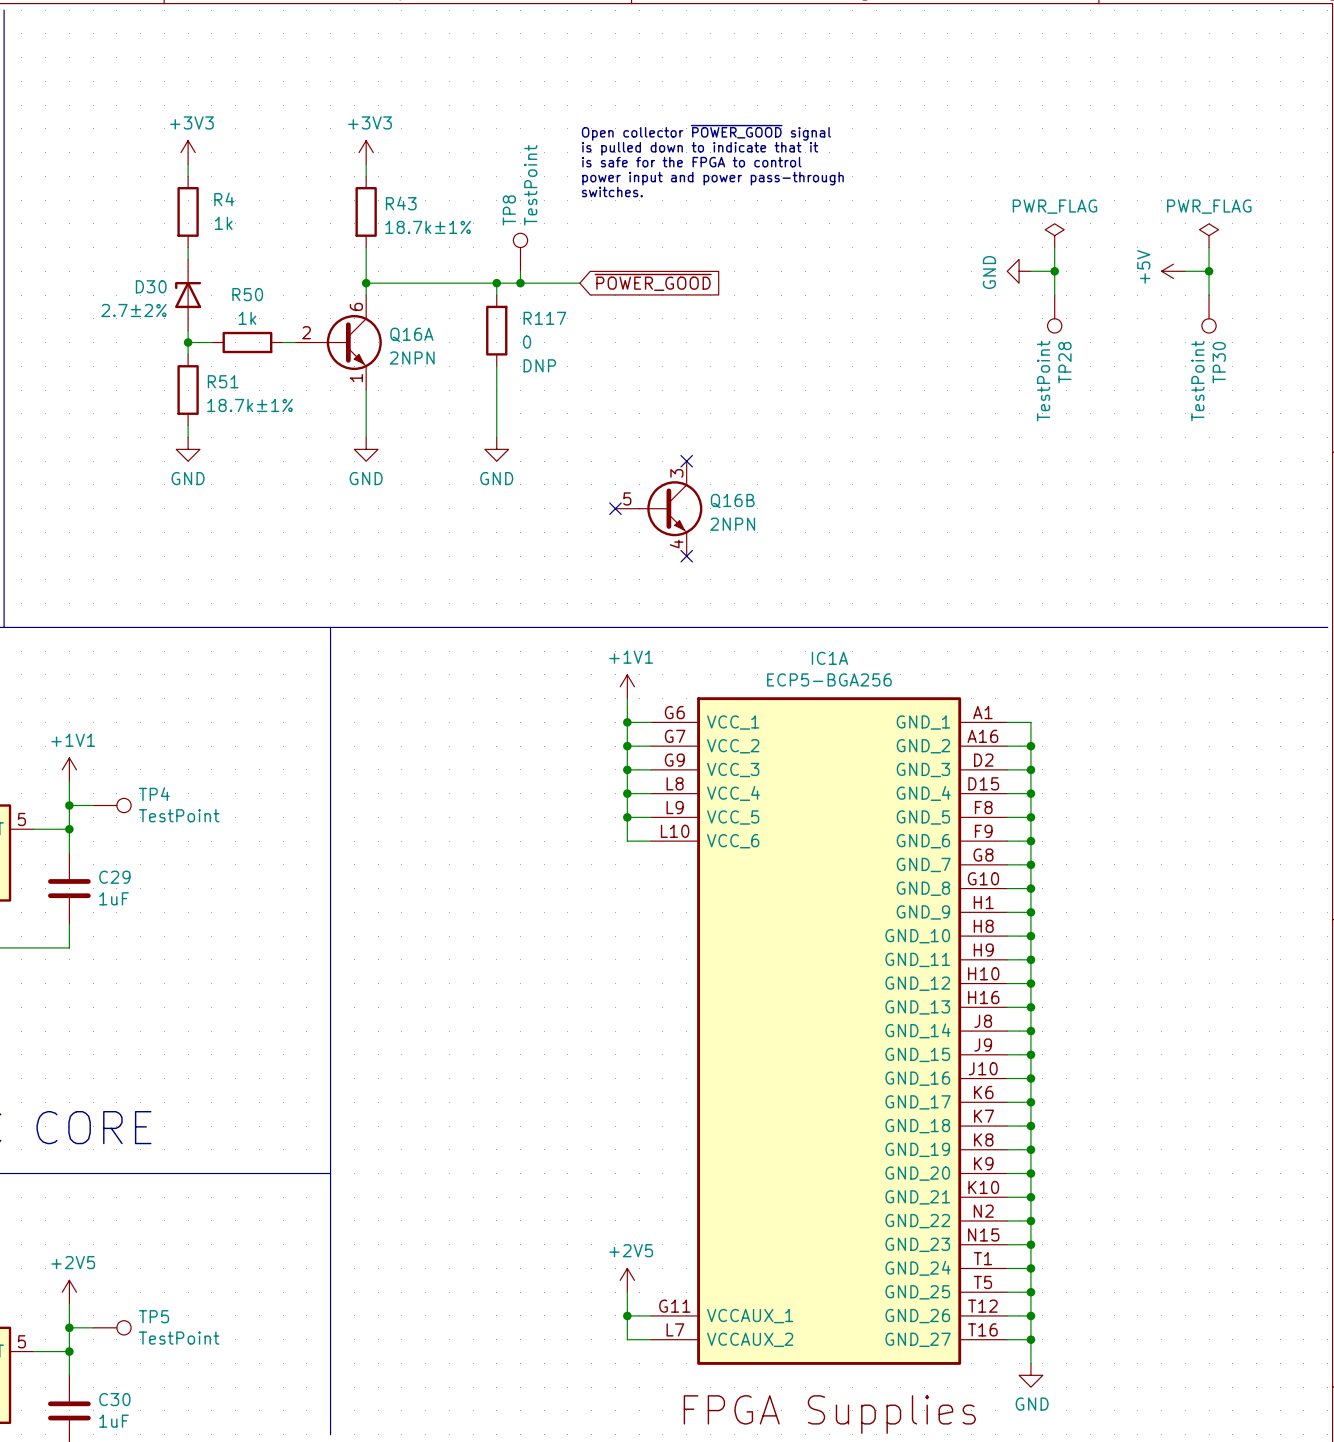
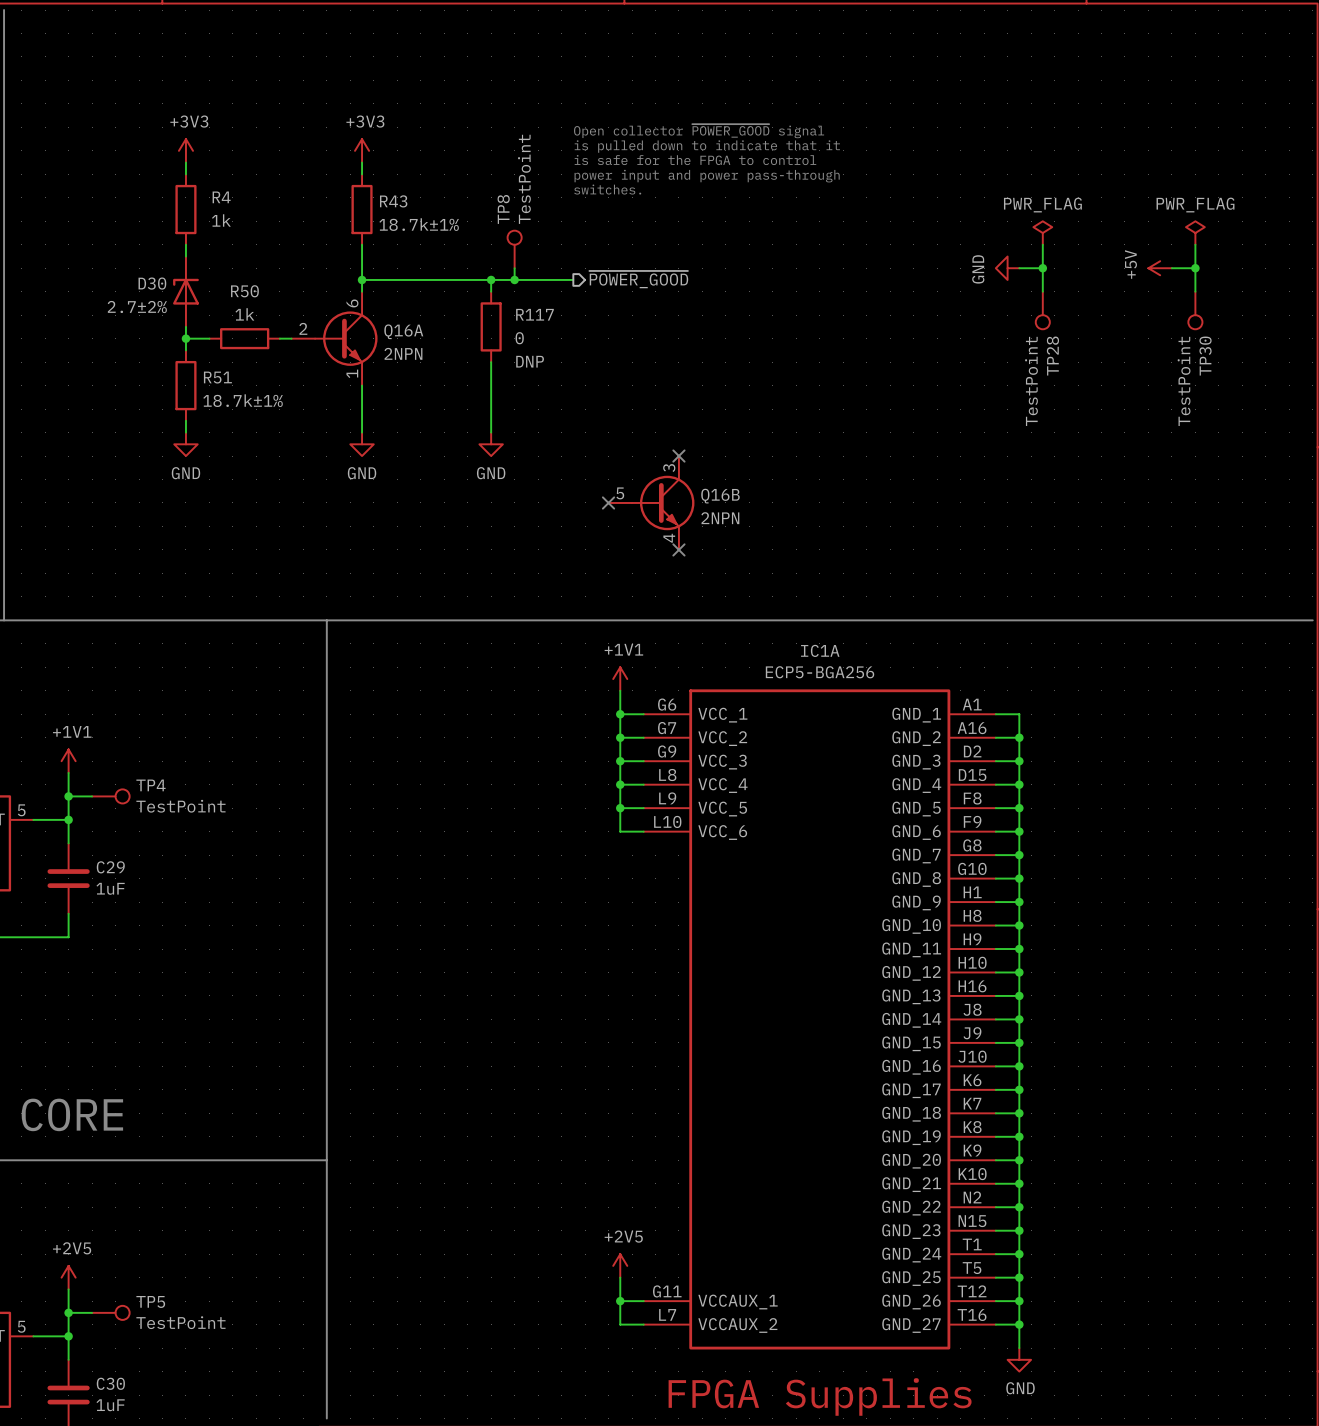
hierarchical label: none -> ~{POWER_GOOD} (638, 279)
global label: ~{POWER_GOOD} (653, 282) -> none

